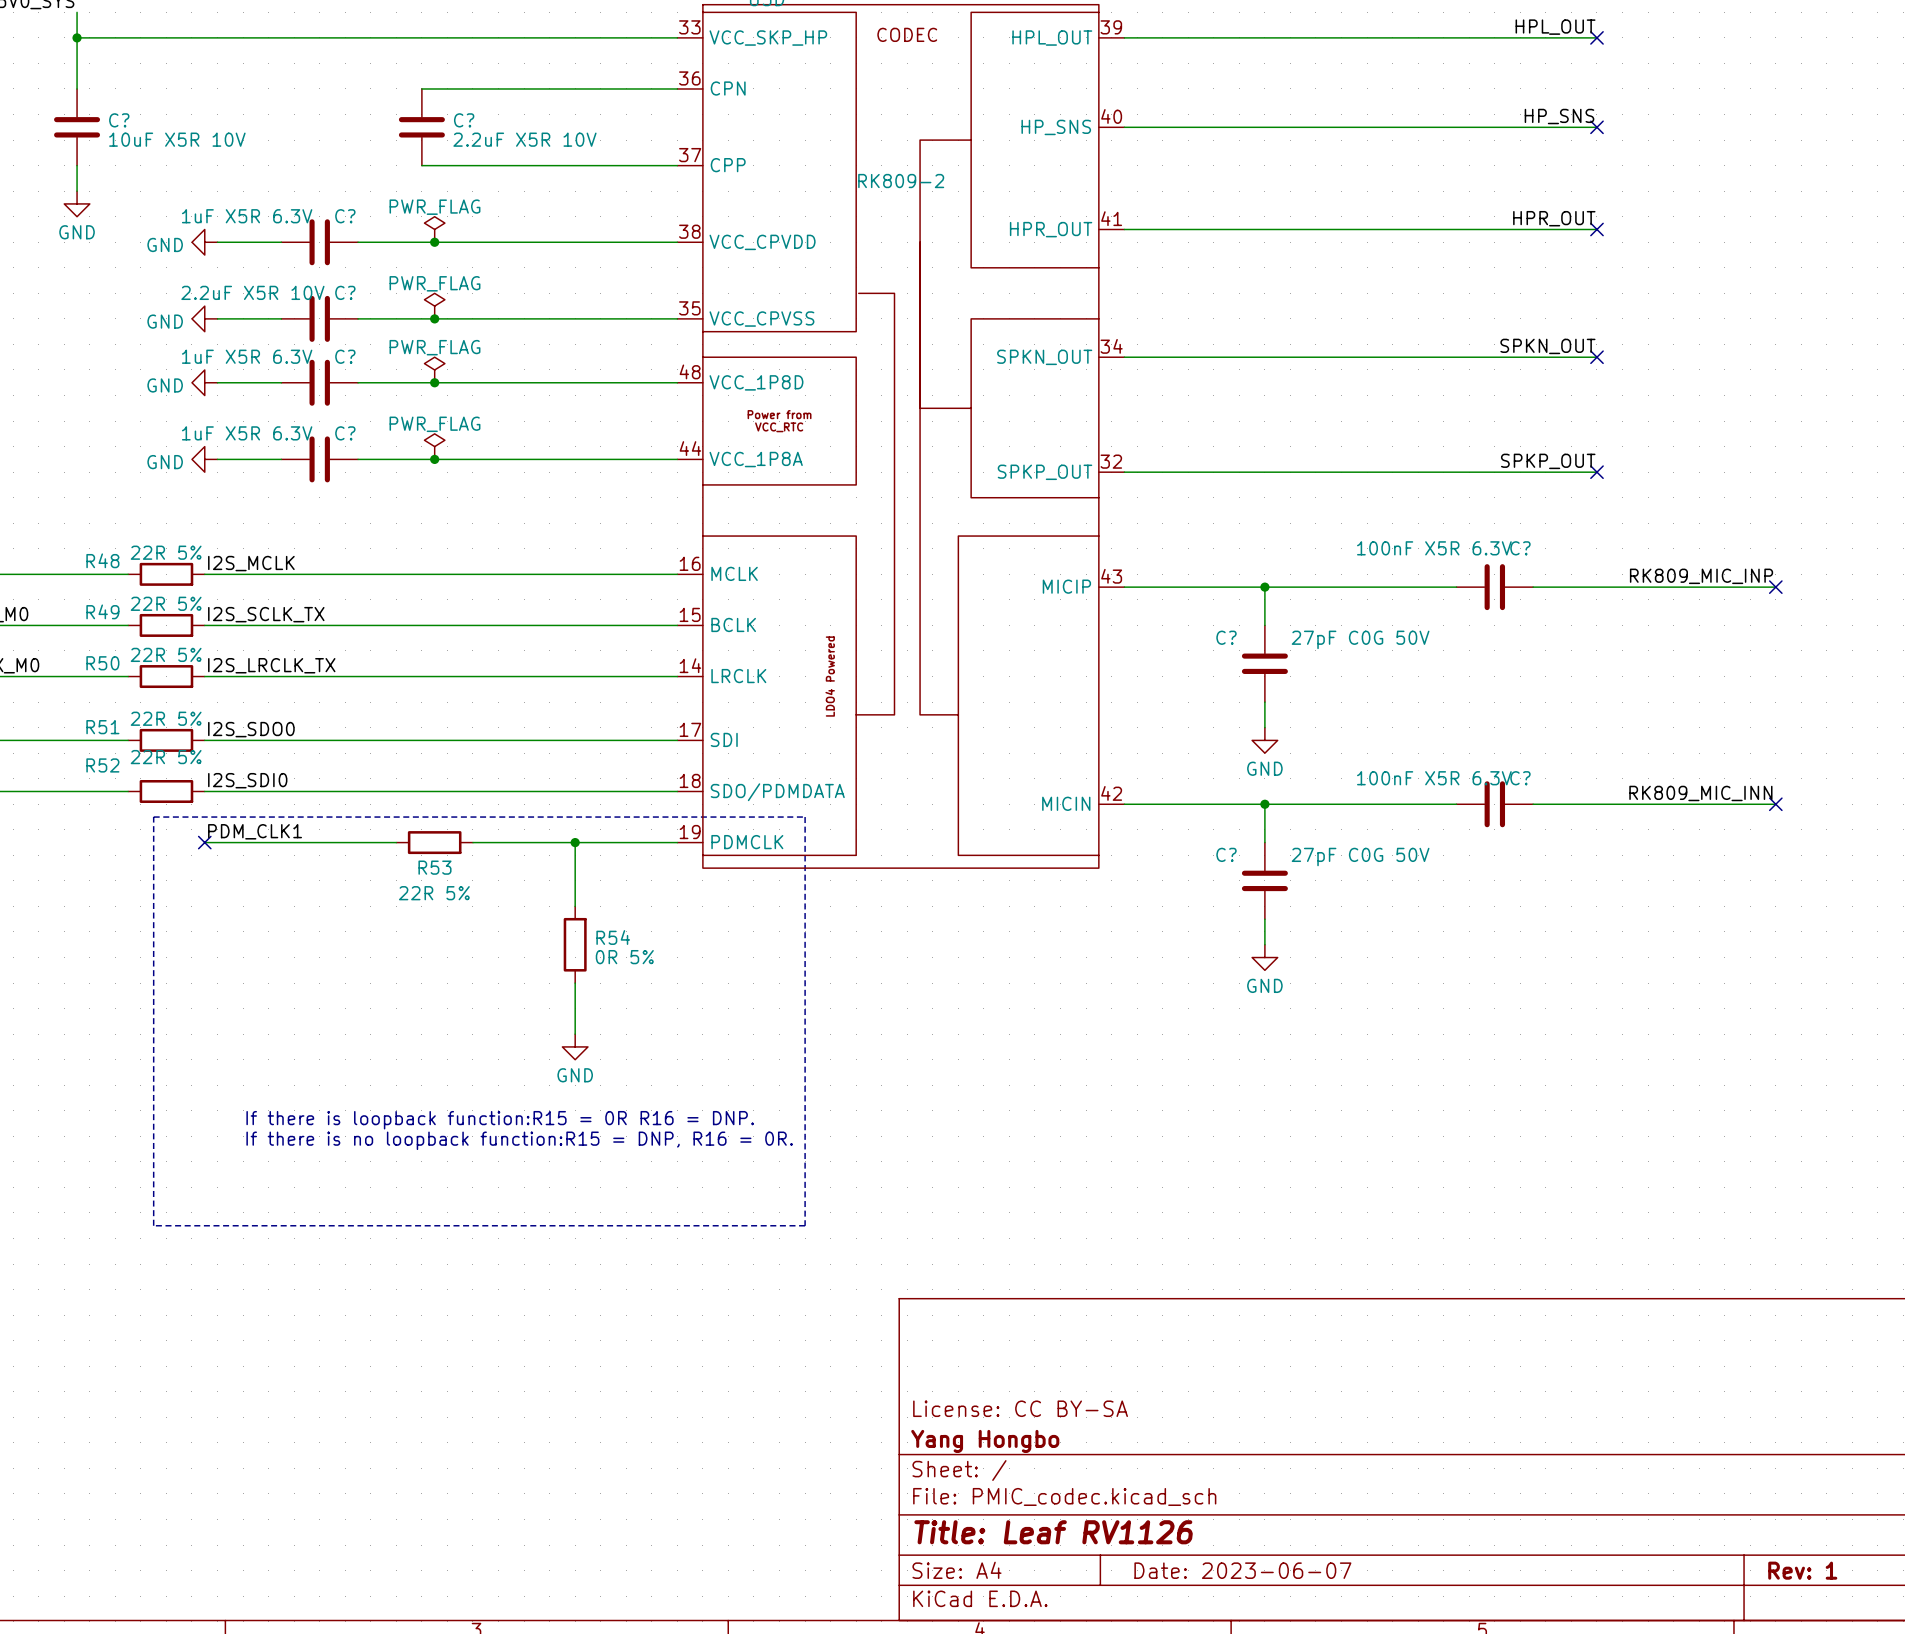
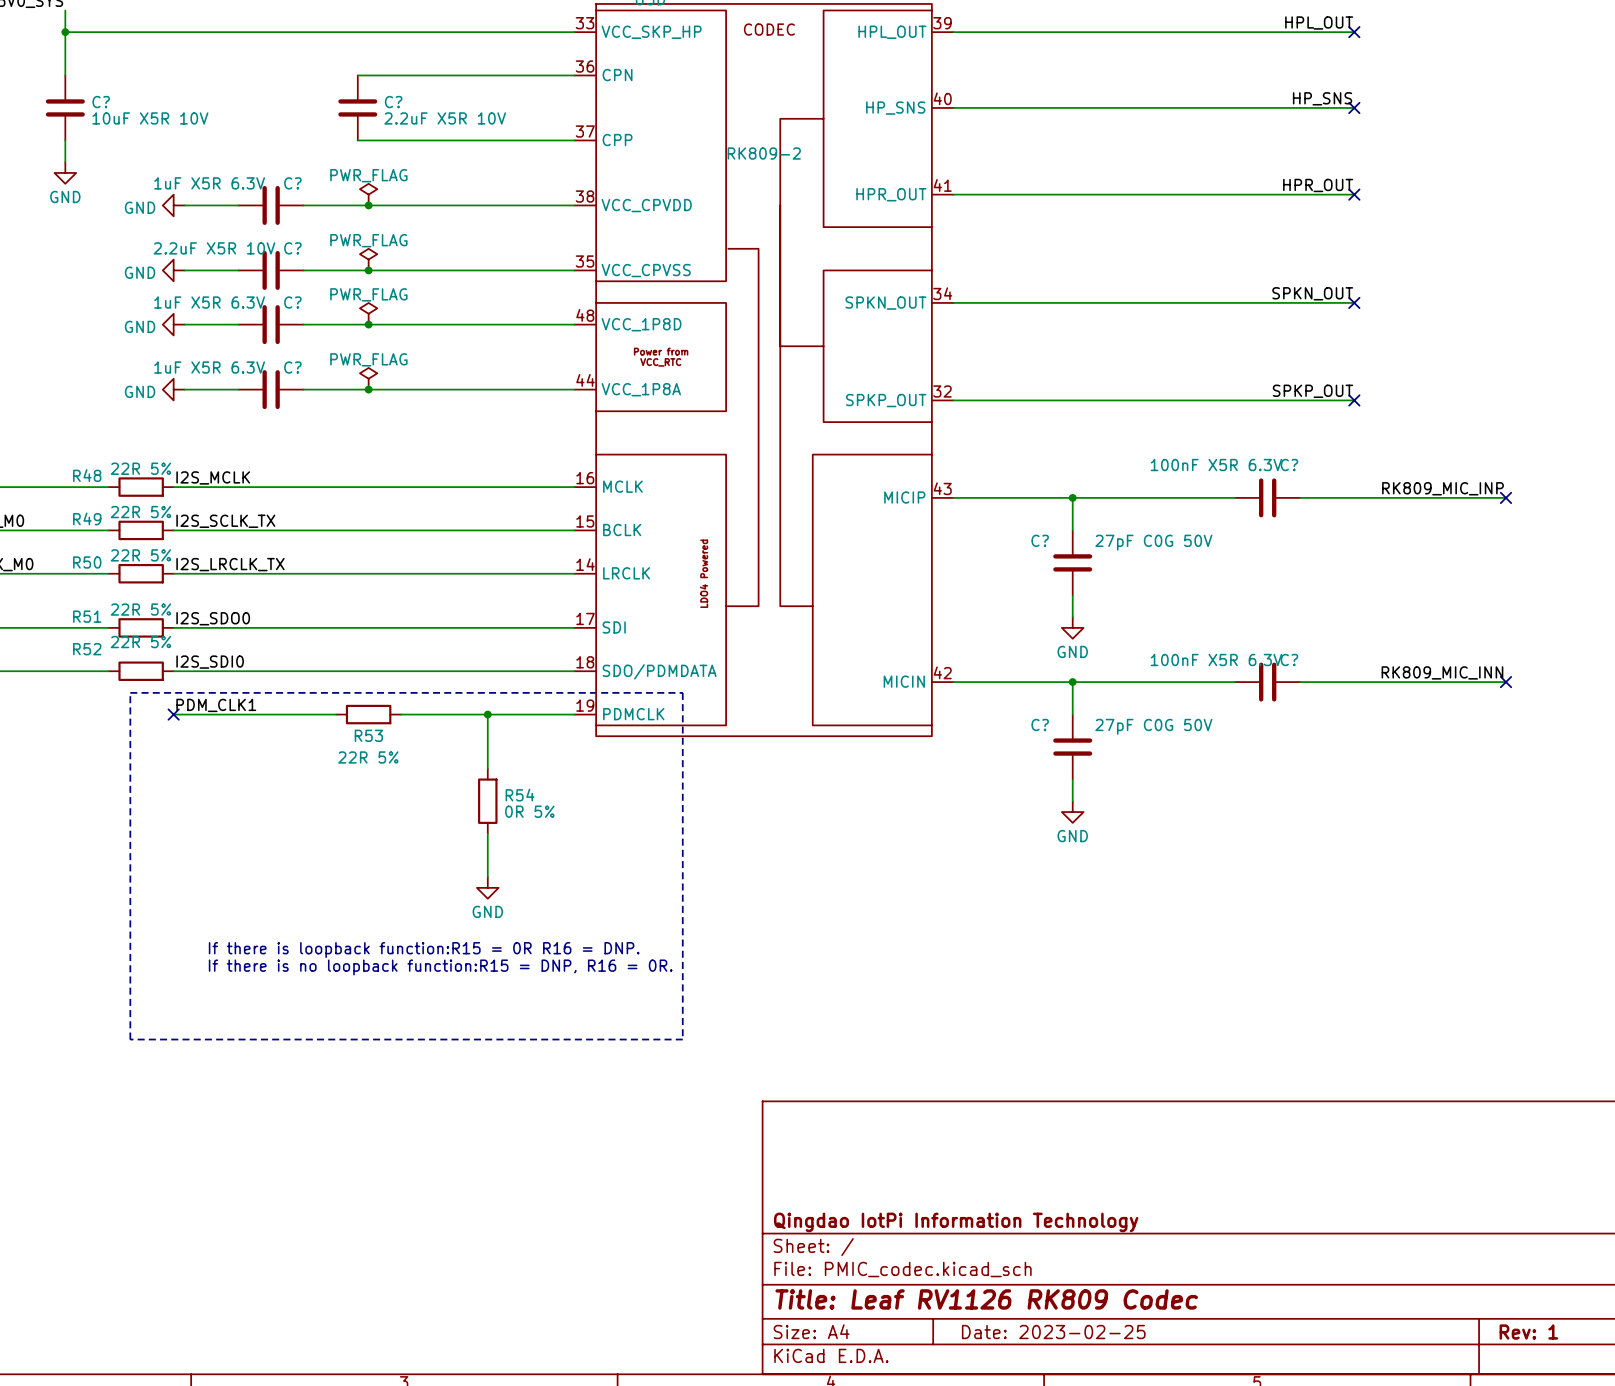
title block: License: CC BY-SA (1020, 1408) -> none
title block: Yang Hongbo (985, 1441) -> Qingdao IotPi Information Technology (956, 1222)
title block: Title: Leaf RV1126 (1053, 1532) -> Title: Leaf RV1126 RK809 Codec (986, 1299)
title block: Date: 2023-06-07 (1242, 1570) -> Date: 2023-02-25 (1053, 1332)

